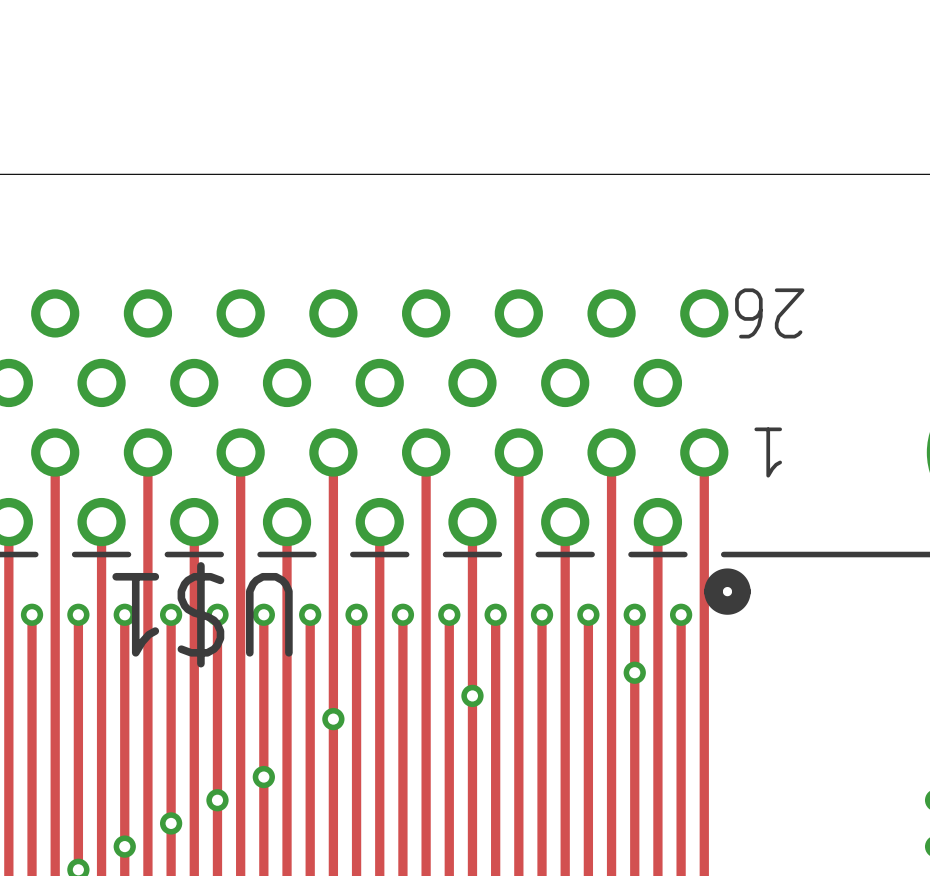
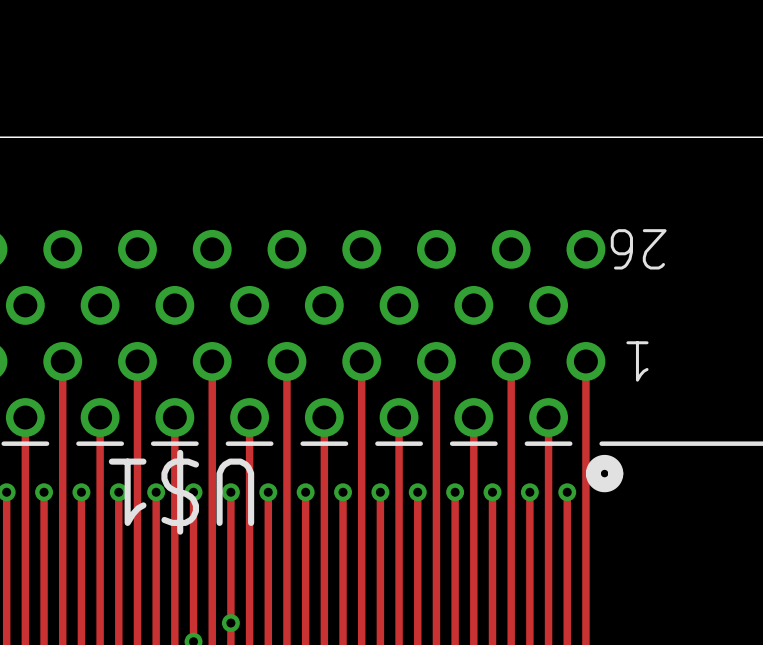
via: (634, 672) -> none
via: (472, 695) -> none
via: (333, 719) -> none

